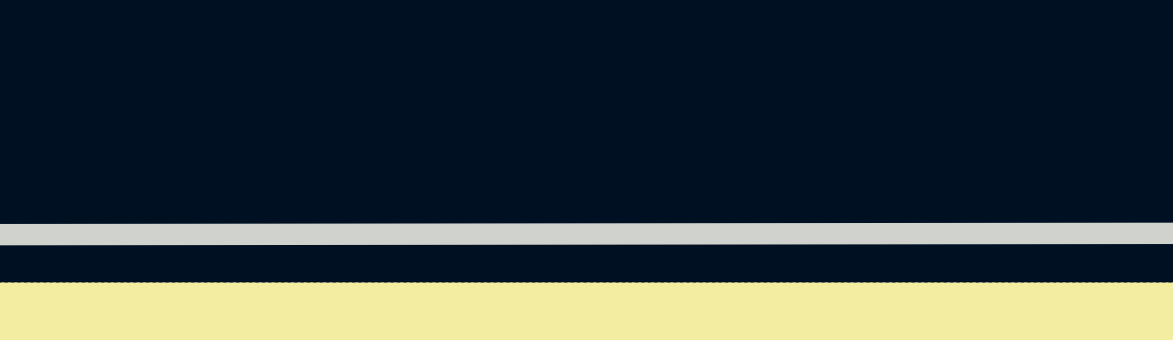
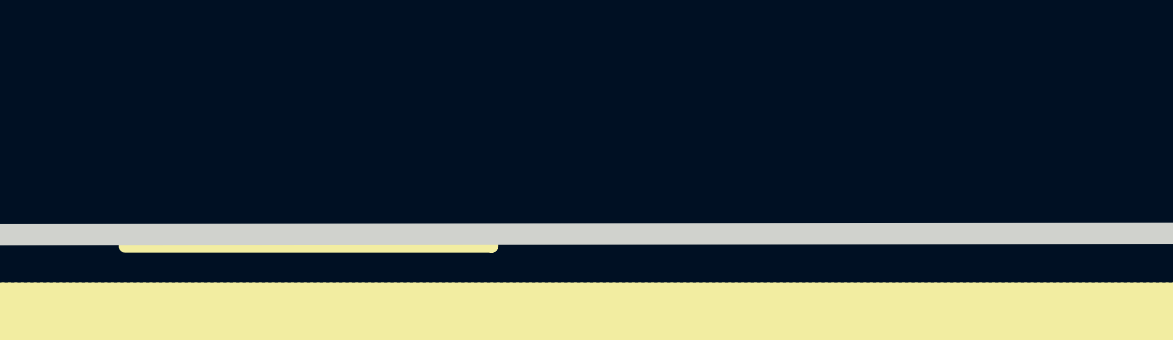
line: none -> (491, 239) (491, 246) (125, 246)

